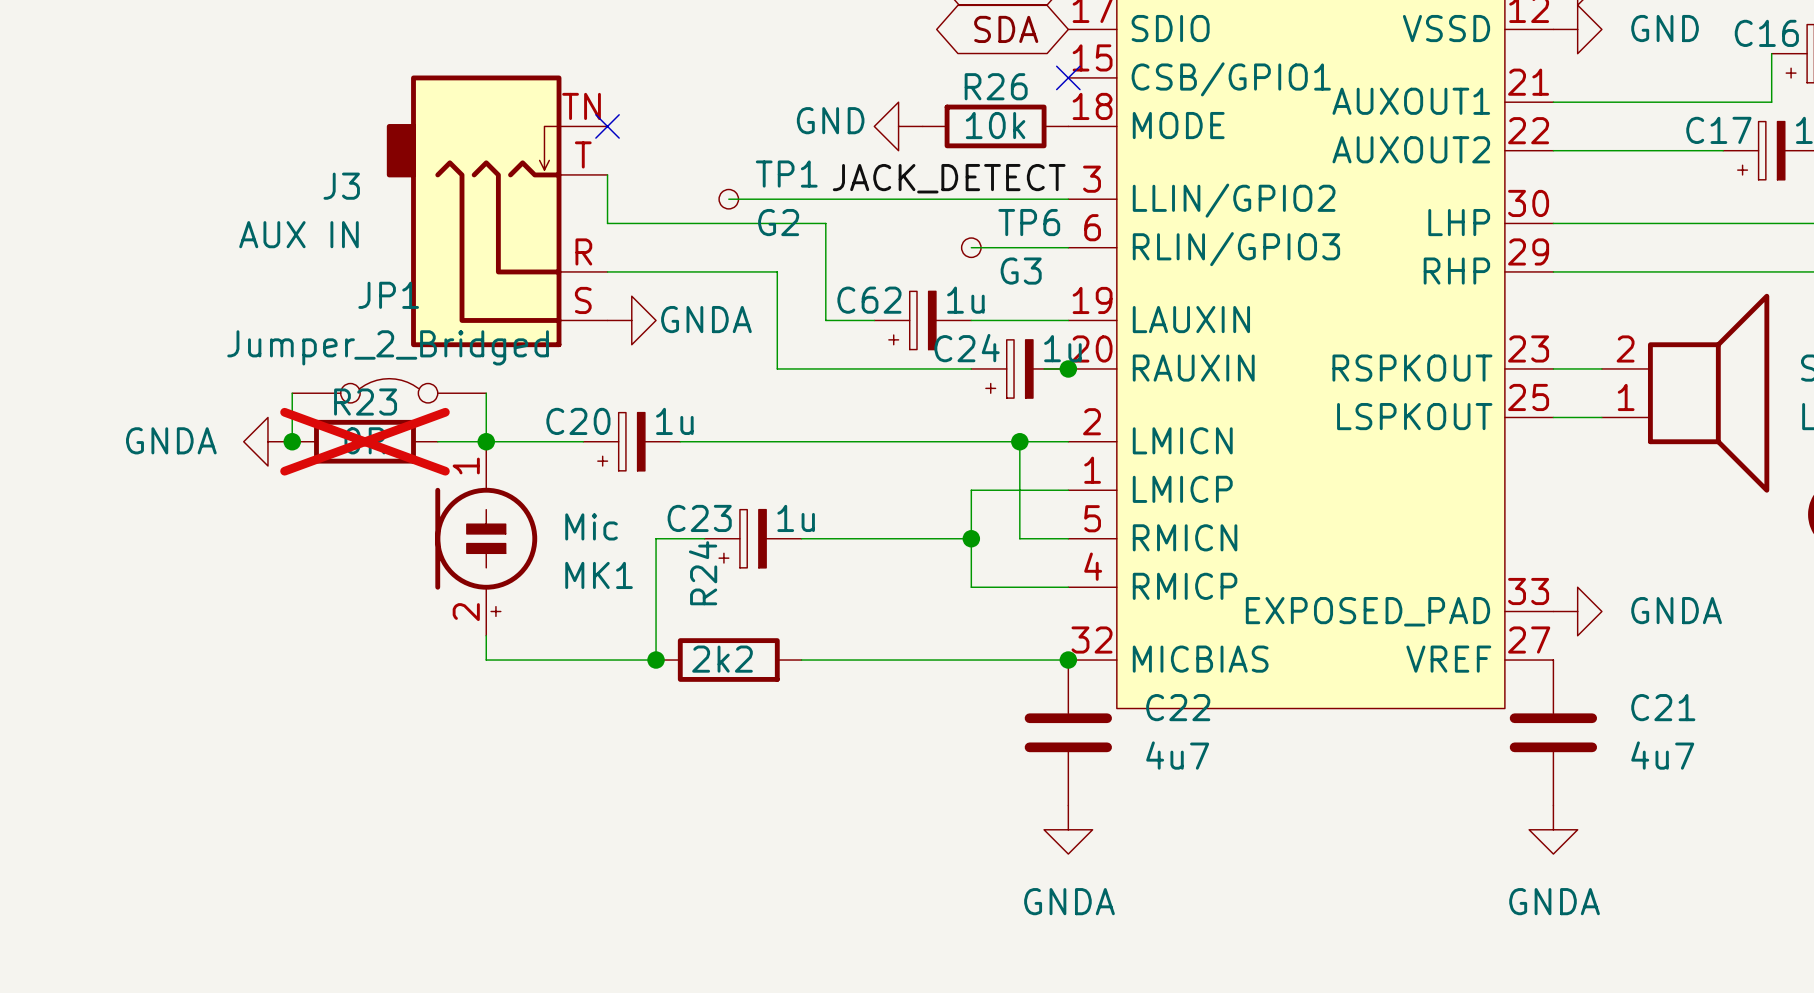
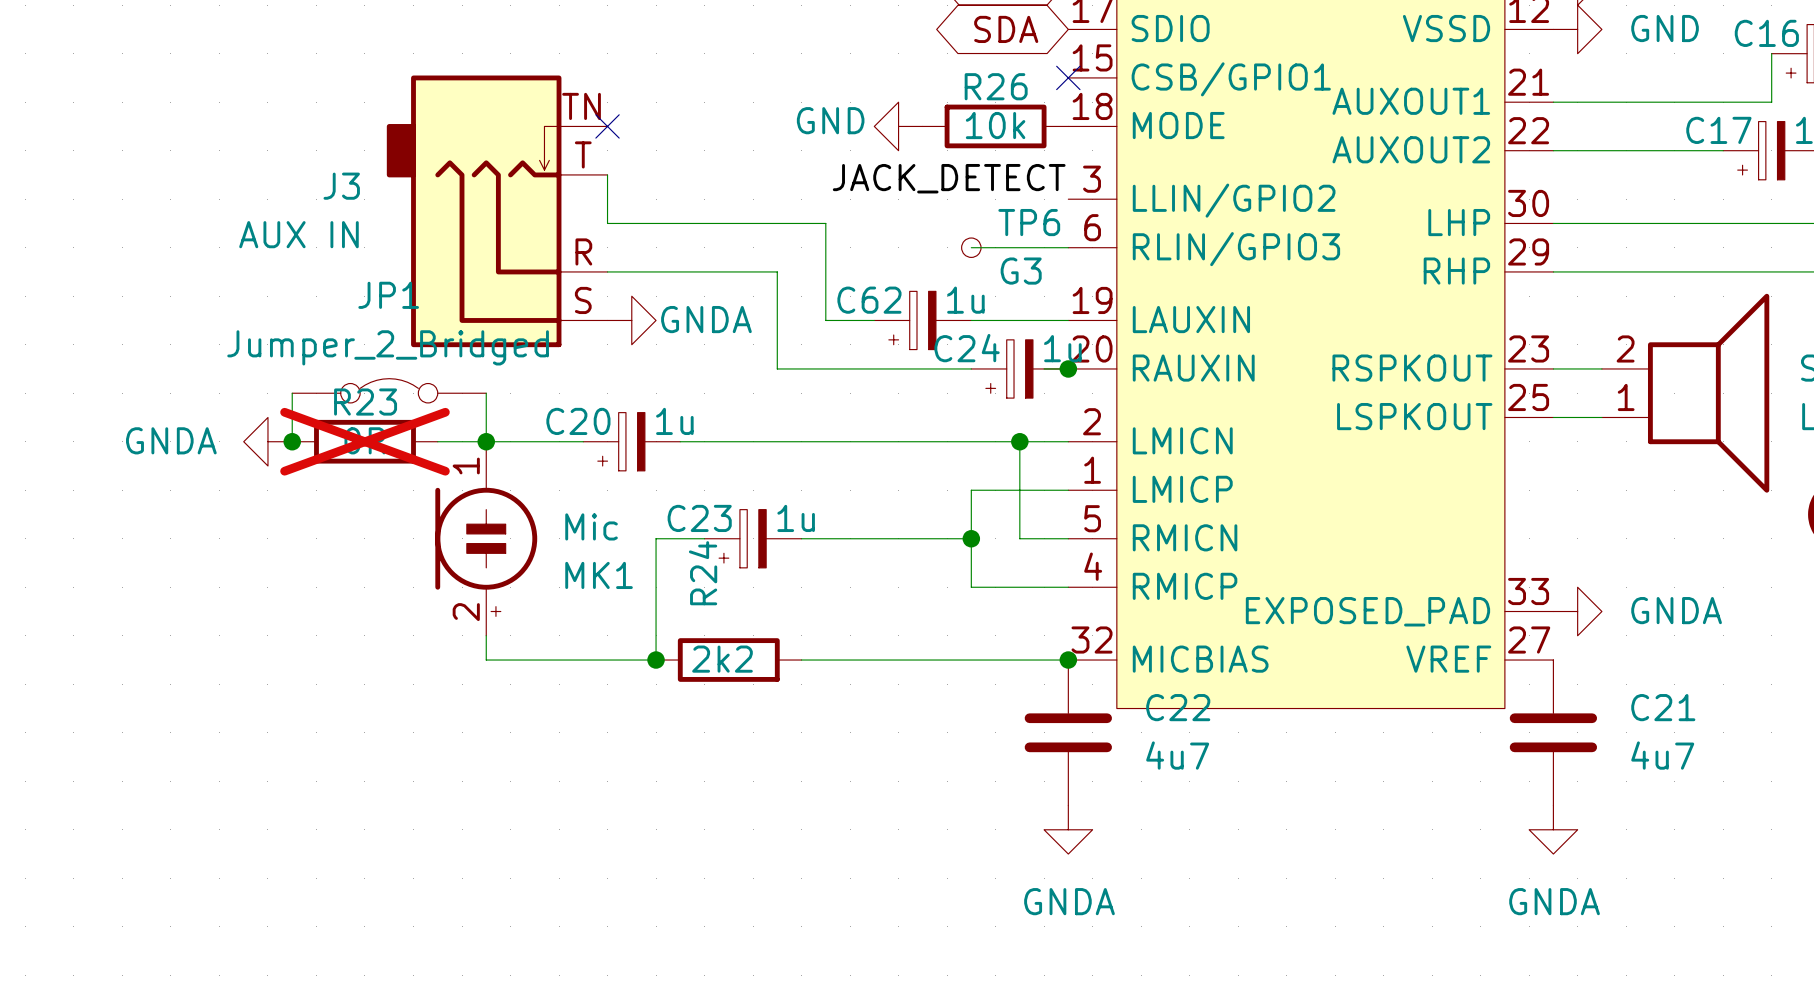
wire: (728, 199) (1068, 199) -> none
TP1: G2 (728, 199) -> none

